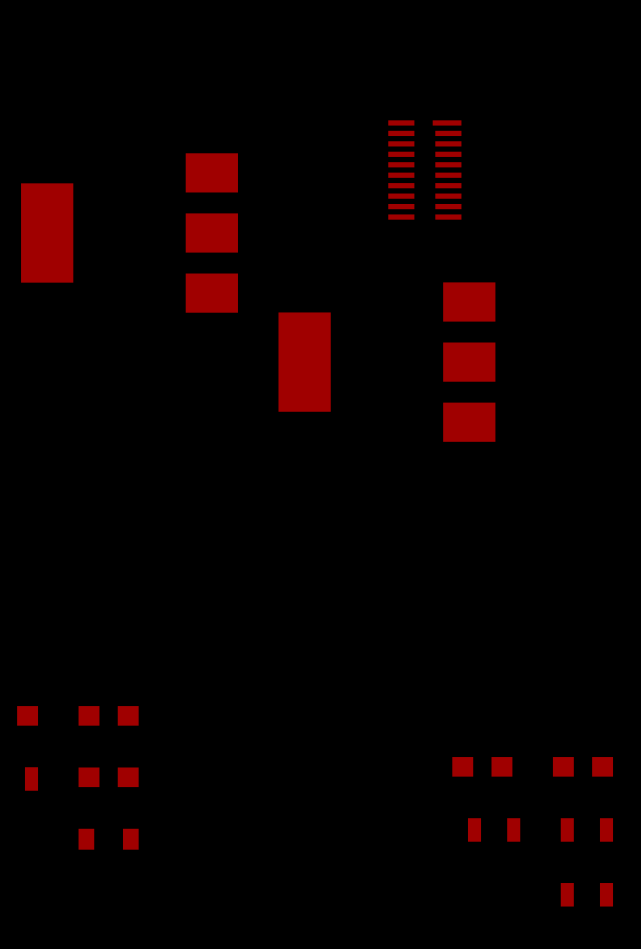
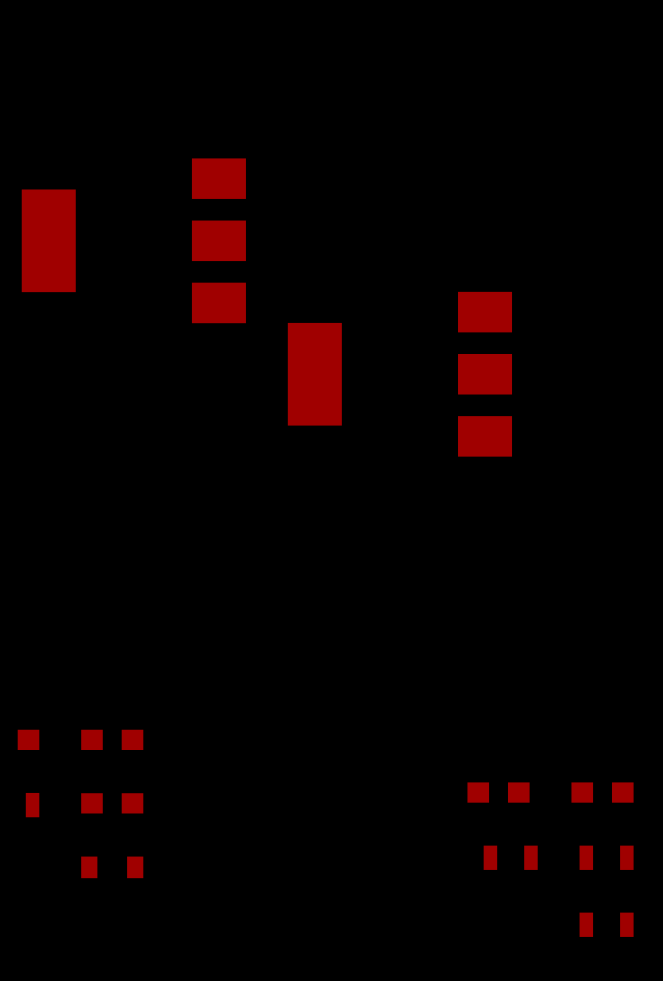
part: (424, 170) -> none

